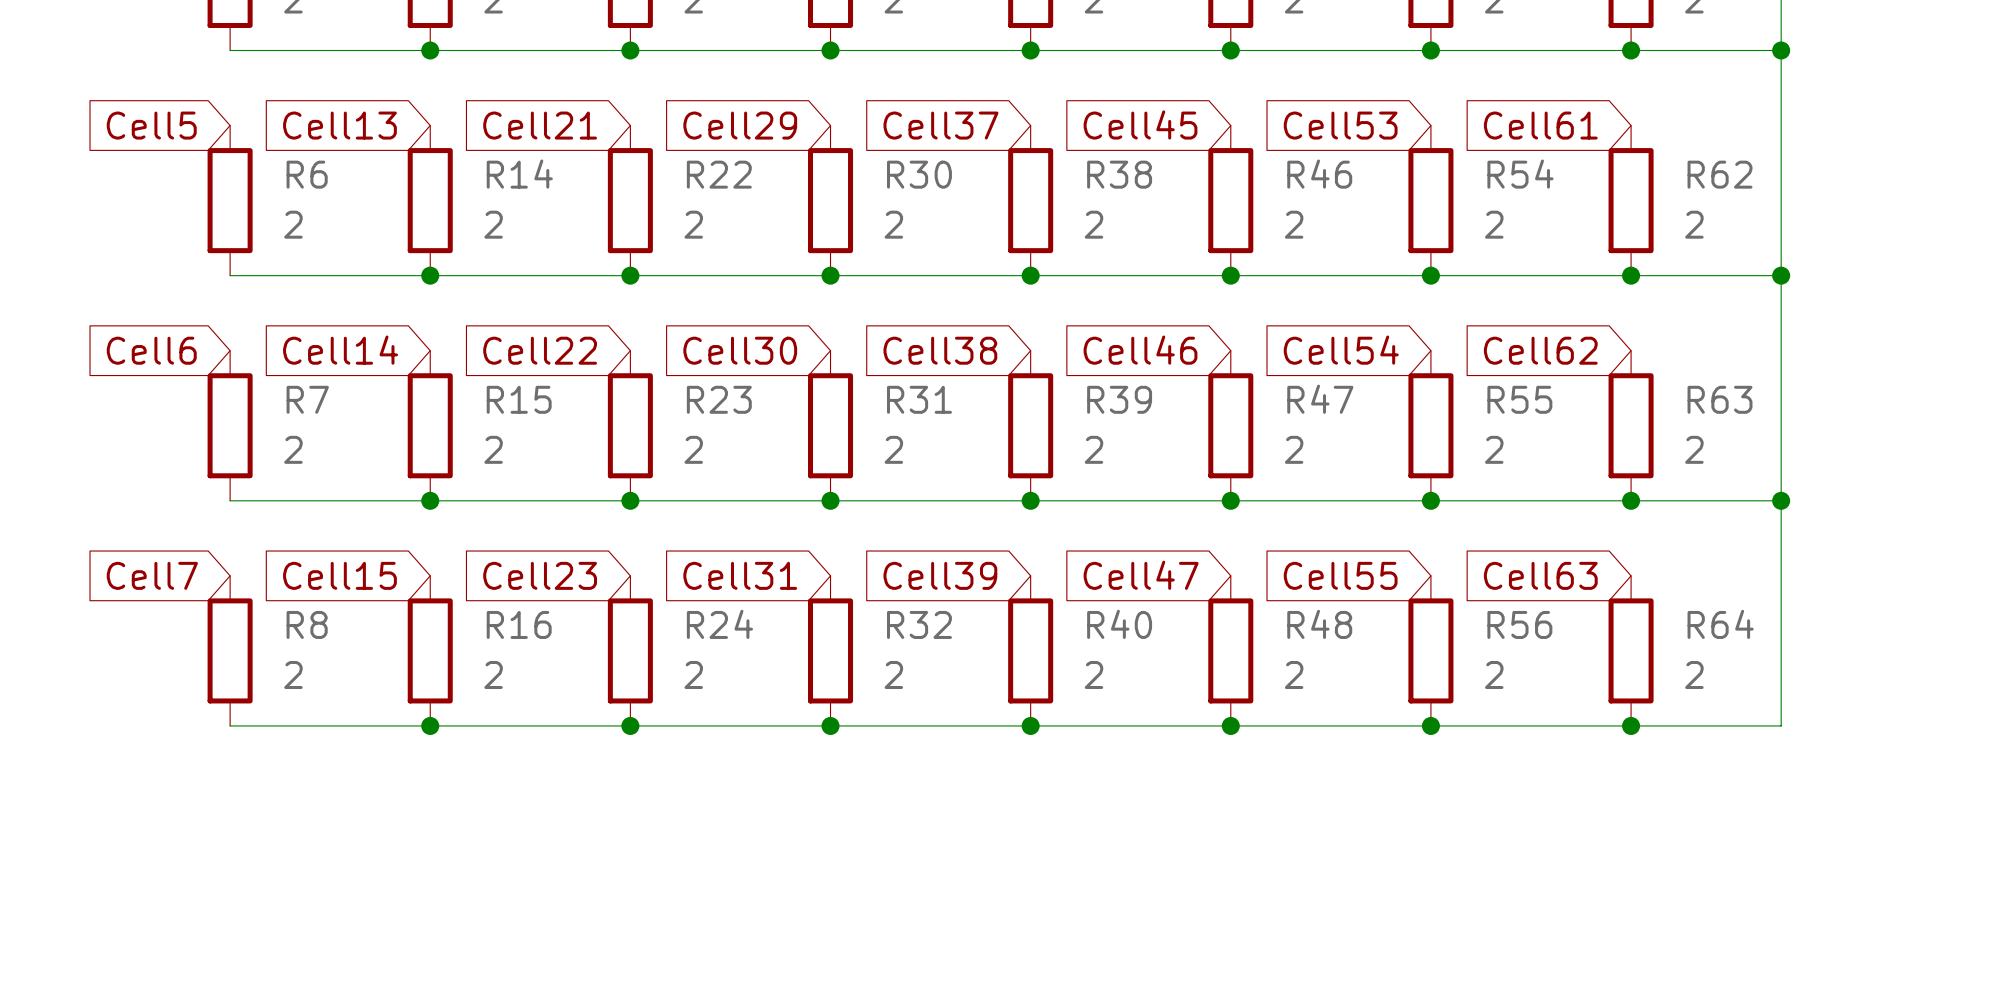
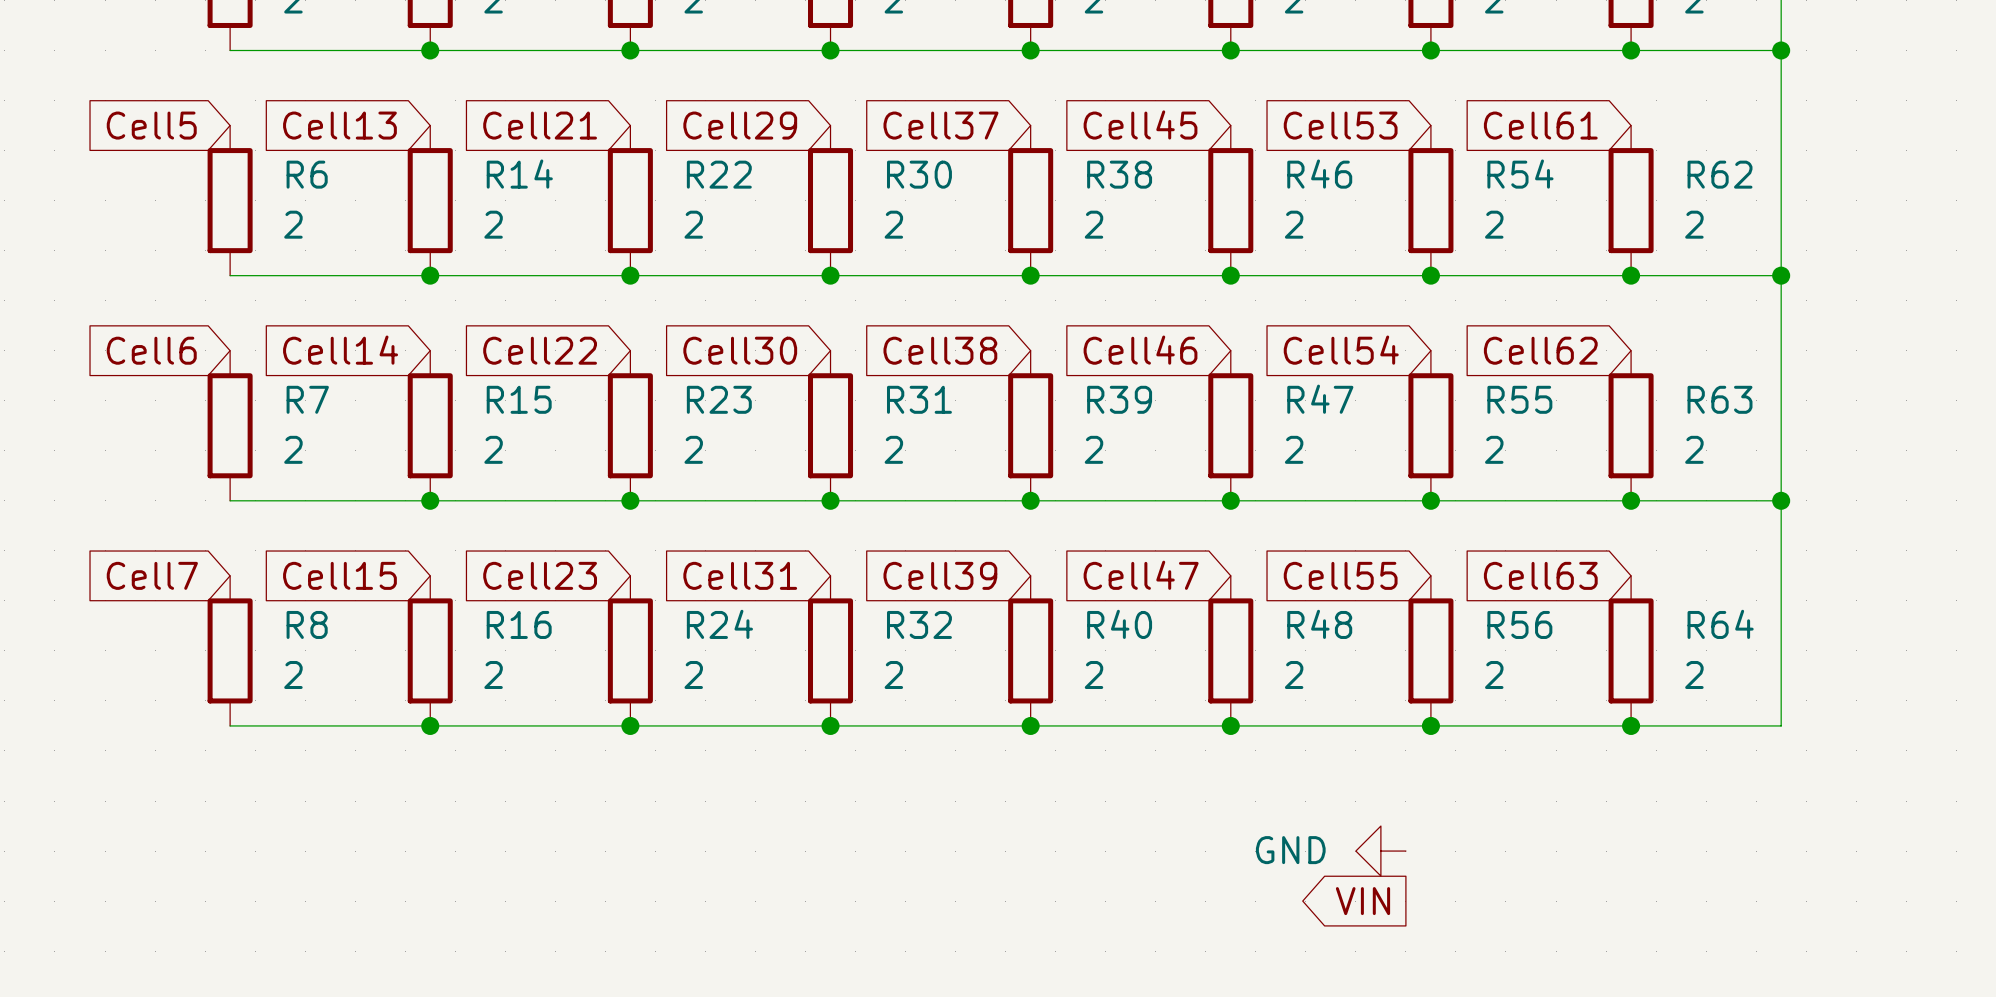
power symbol: none -> GND (1380, 851)
global label: none -> VIN (1362, 901)

